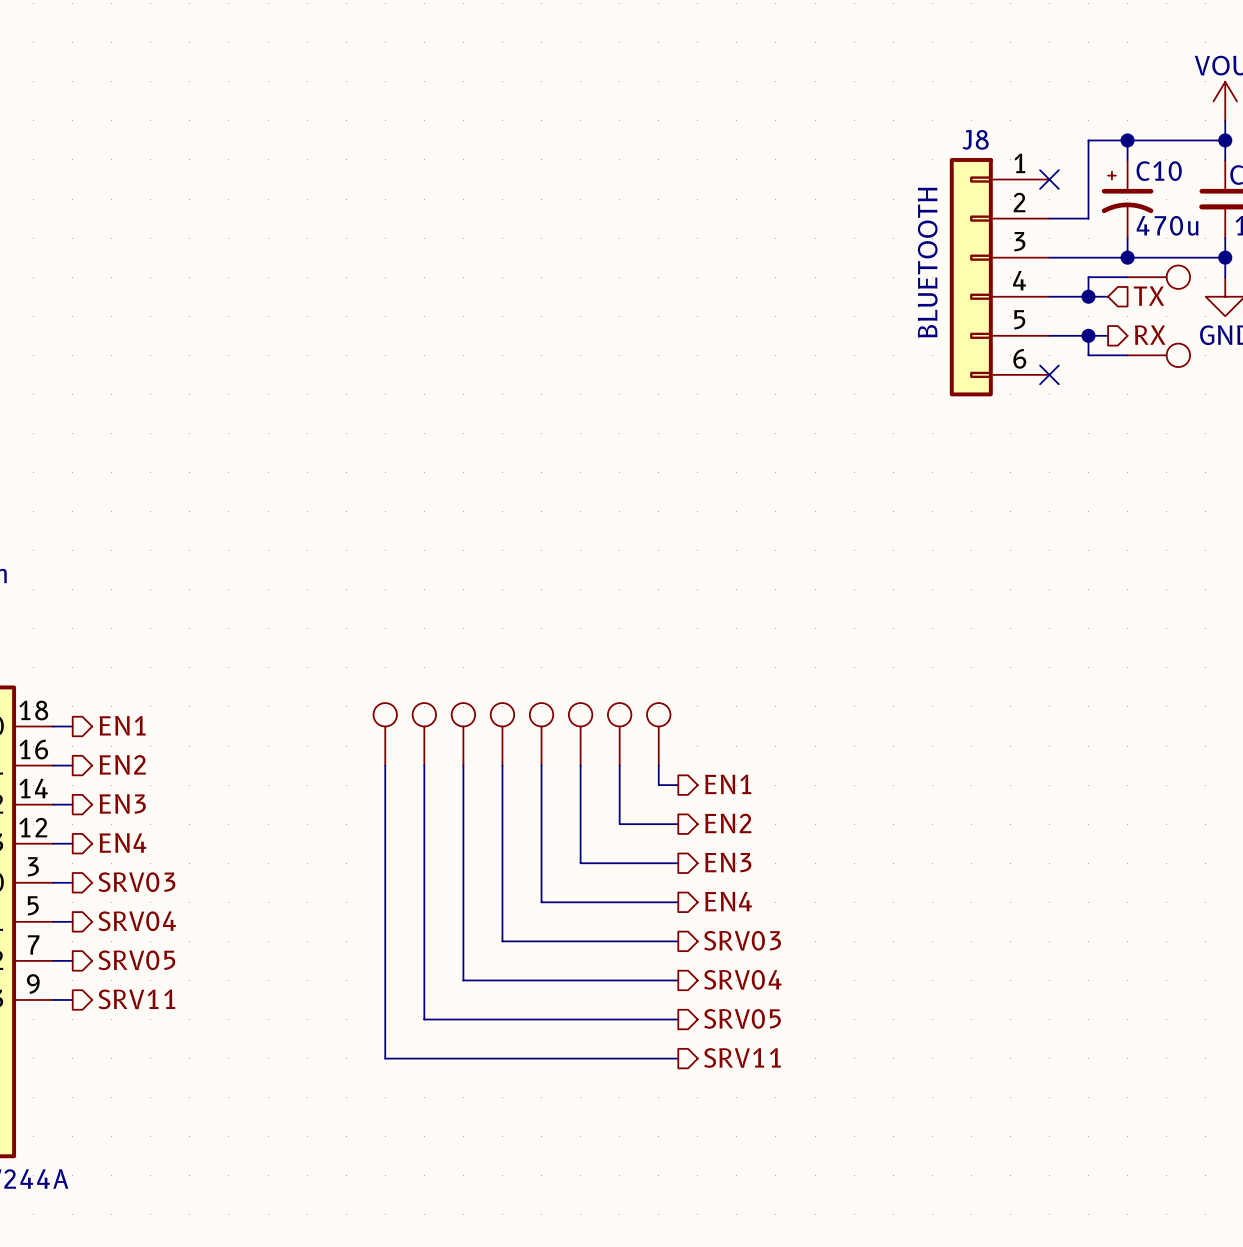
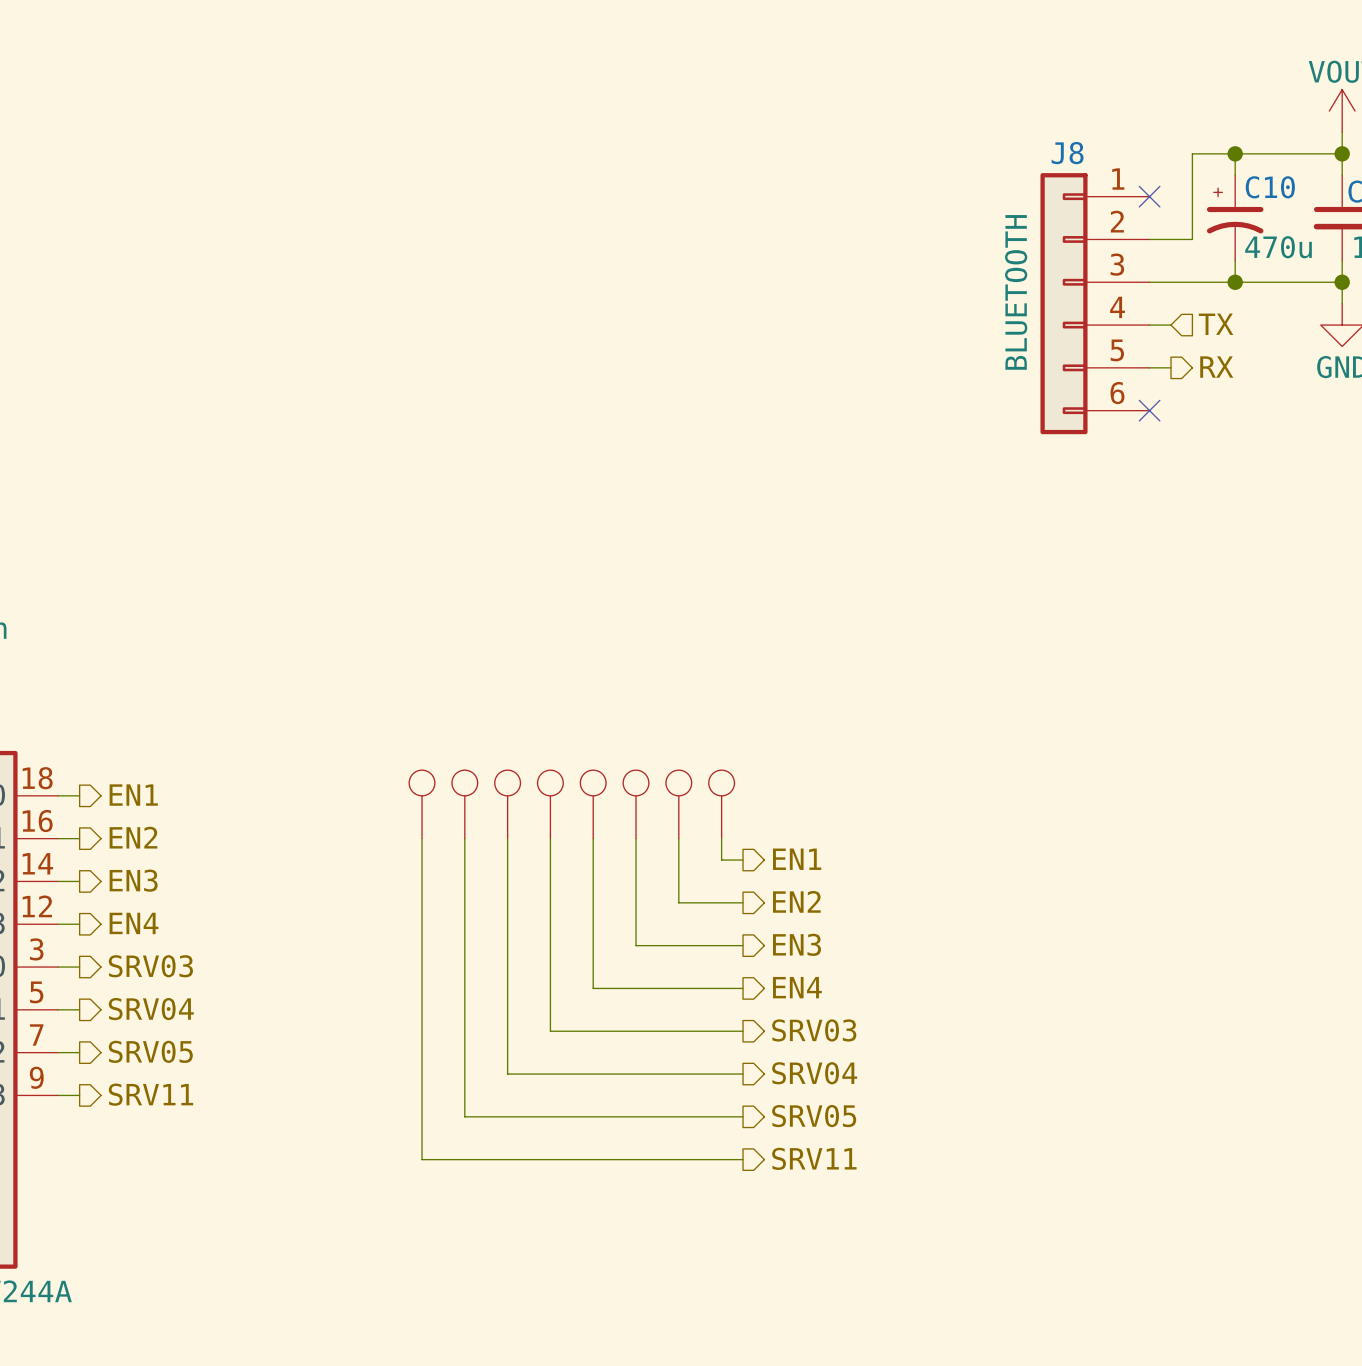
wire: (1127, 277) (1088, 277) (1088, 296) -> none
part: (1158, 277) -> none
wire: (1068, 296) (1108, 296) -> none
junction: (1088, 296) -> none
hierarchical label position: TX (1149, 296) -> TX (1216, 324)
wire: (1068, 335) (1108, 335) -> none
wire: (1088, 335) (1088, 355) (1127, 355) -> none
junction: (1088, 335) -> none
hierarchical label position: RX (1150, 335) -> RX (1216, 367)
part: (1158, 355) -> none

